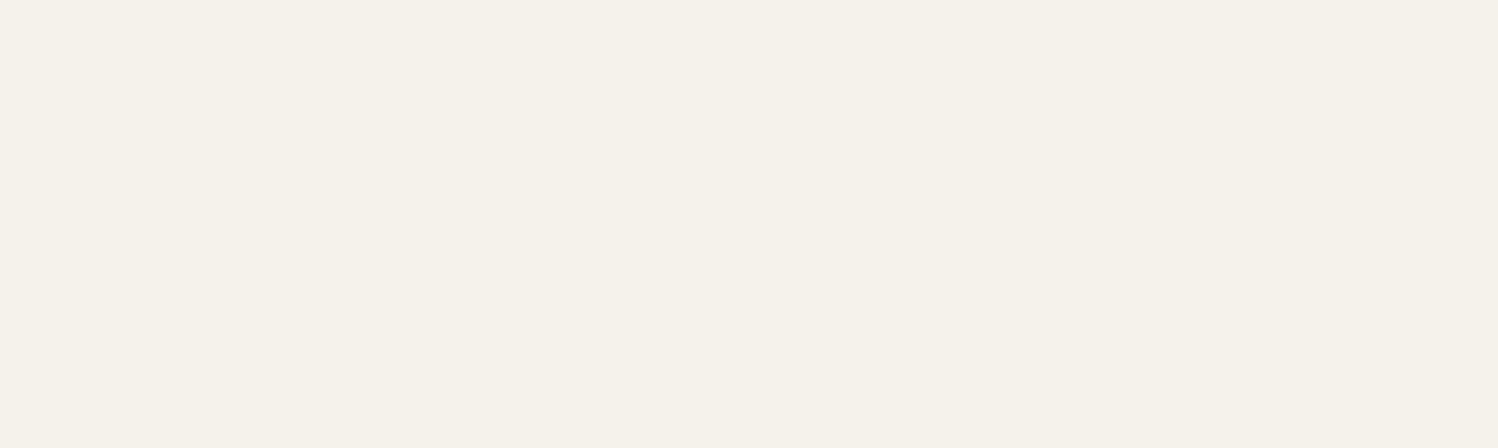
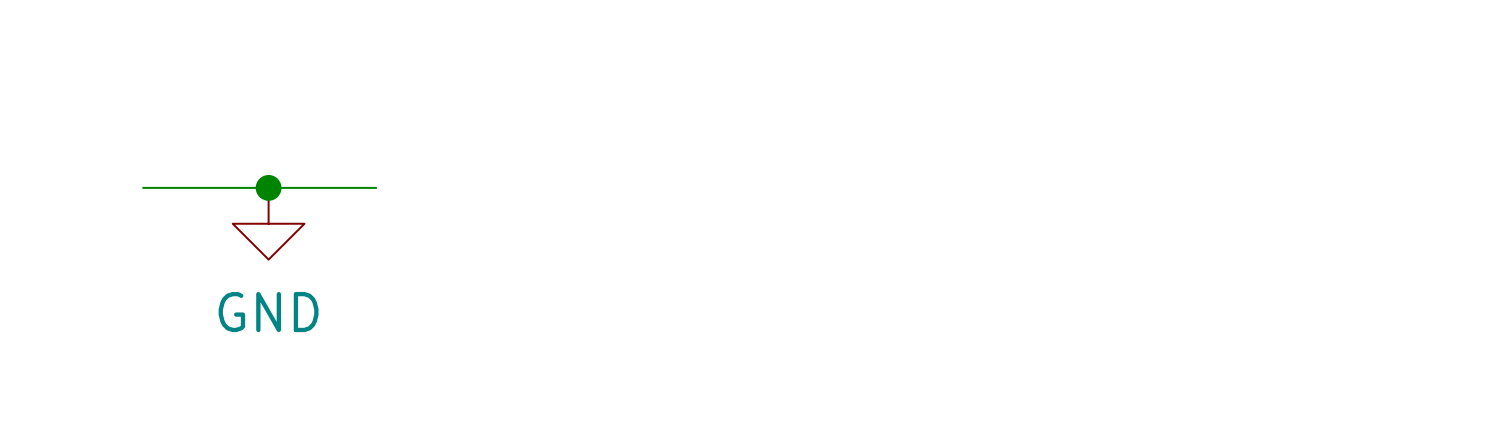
wire: none -> (143, 187) (376, 187)
junction: none -> (268, 187)
power symbol: none -> GND (268, 223)

